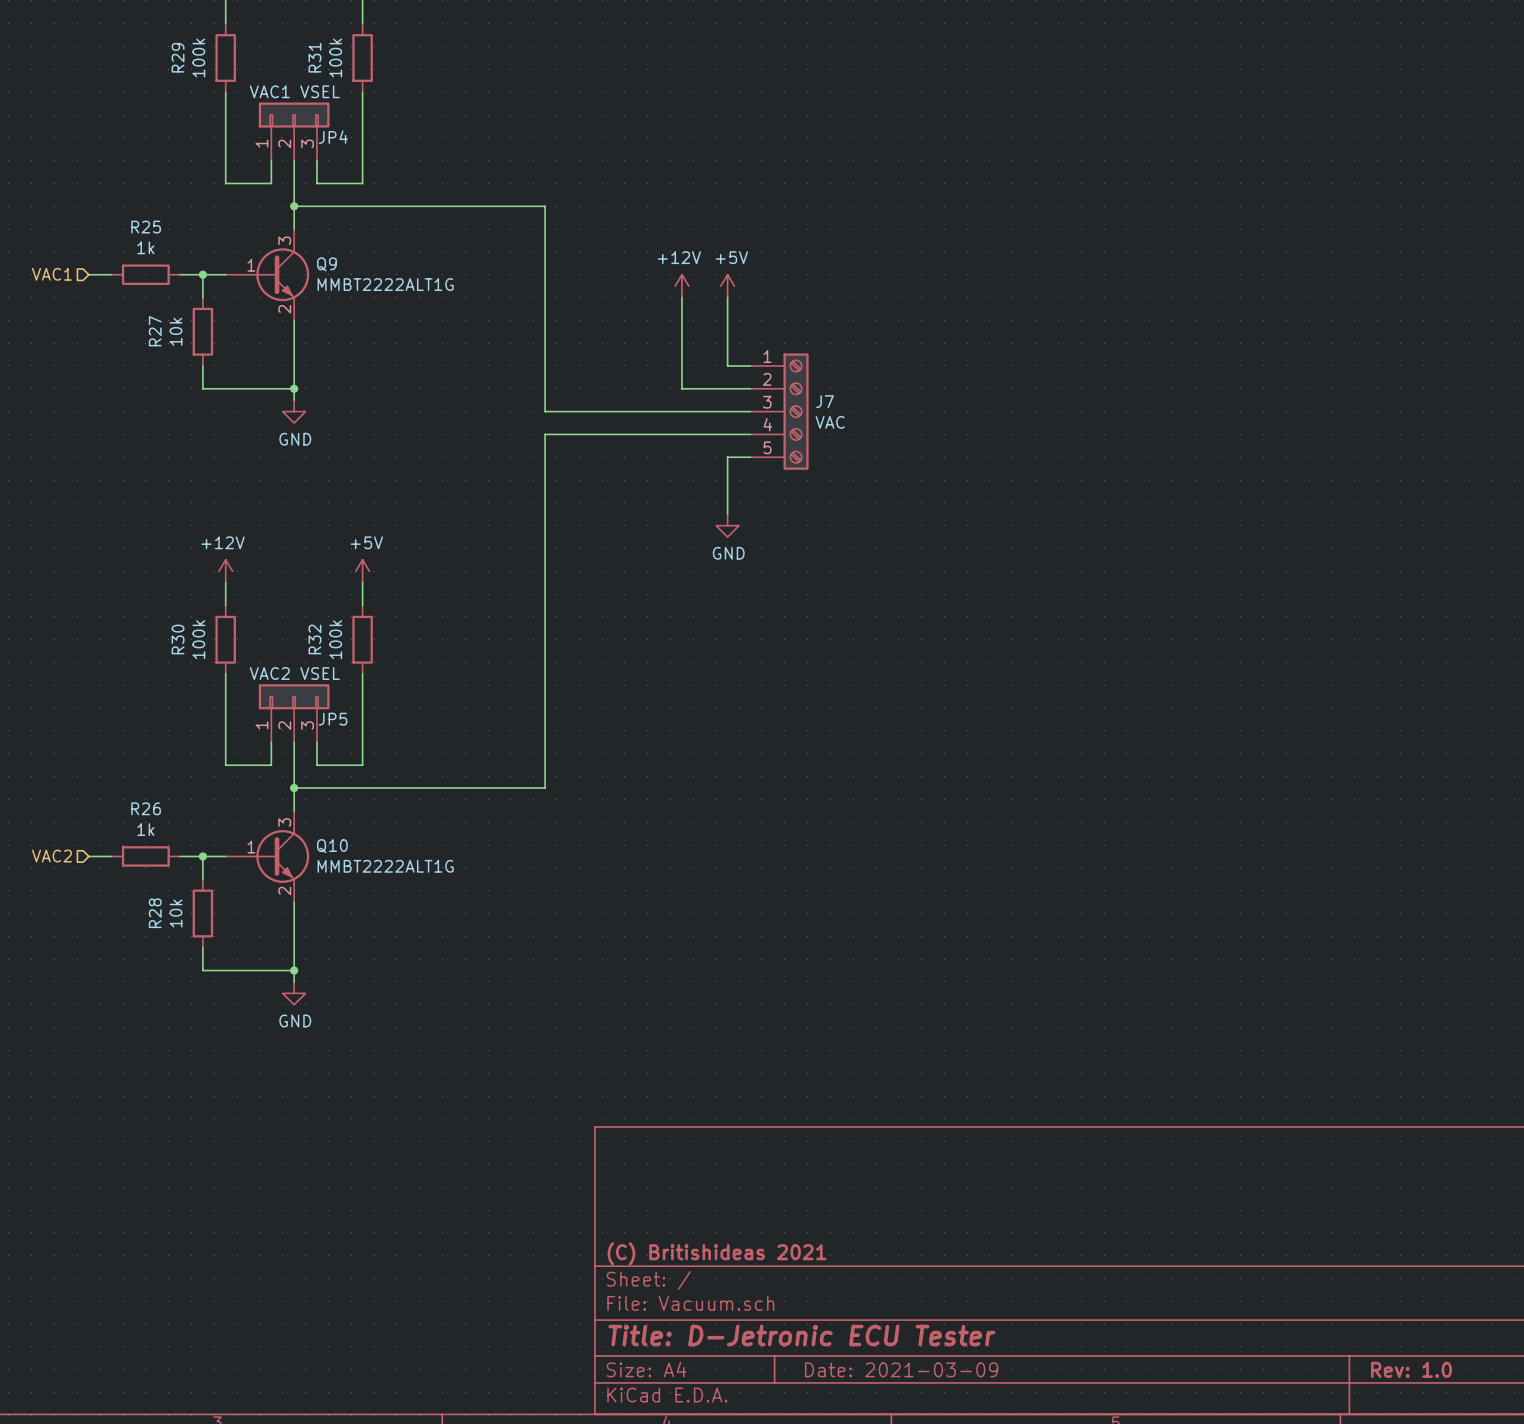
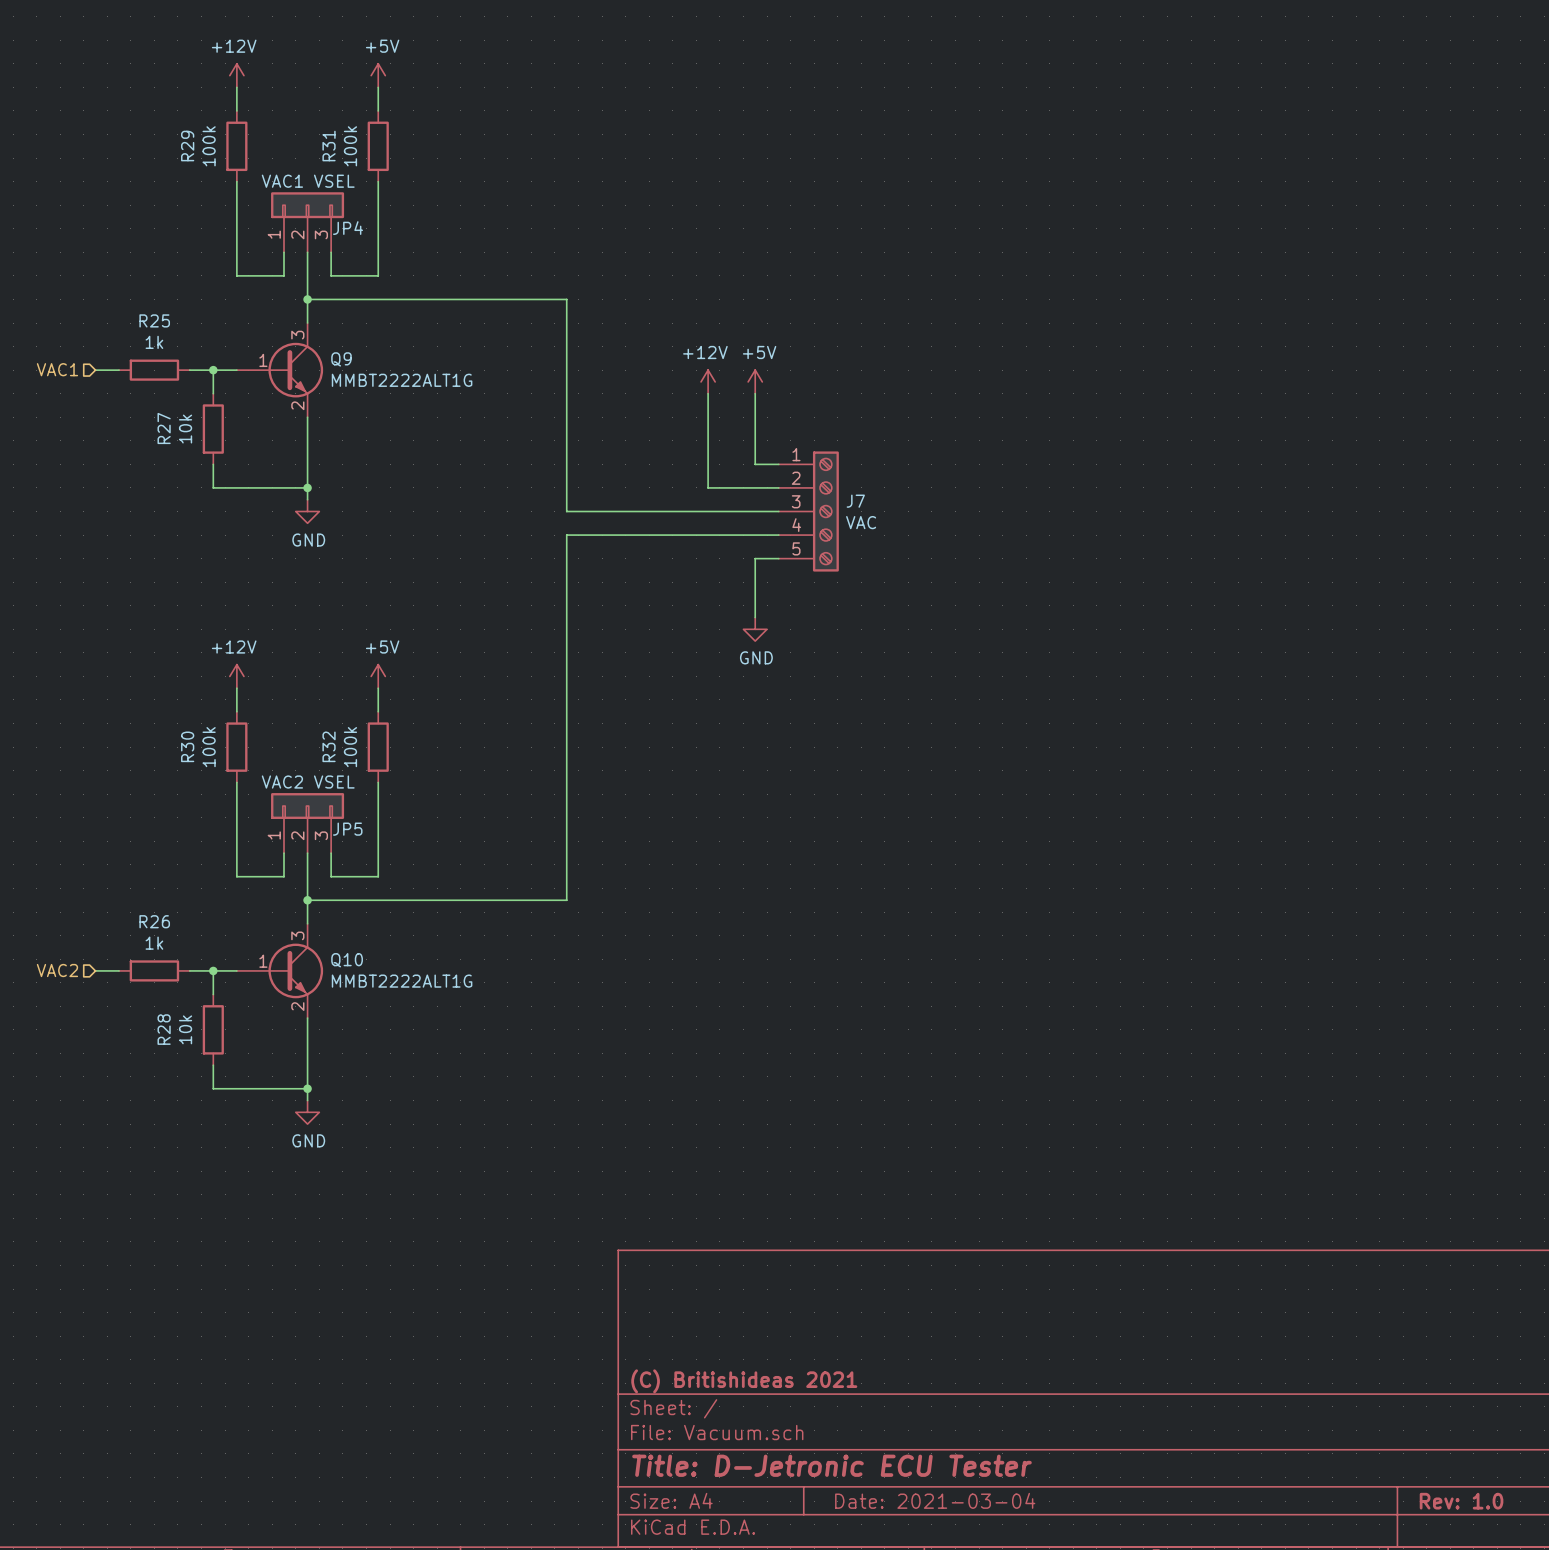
title block: Date: 2021-03-09 (901, 1369) -> Date: 2021-03-04 (935, 1500)

